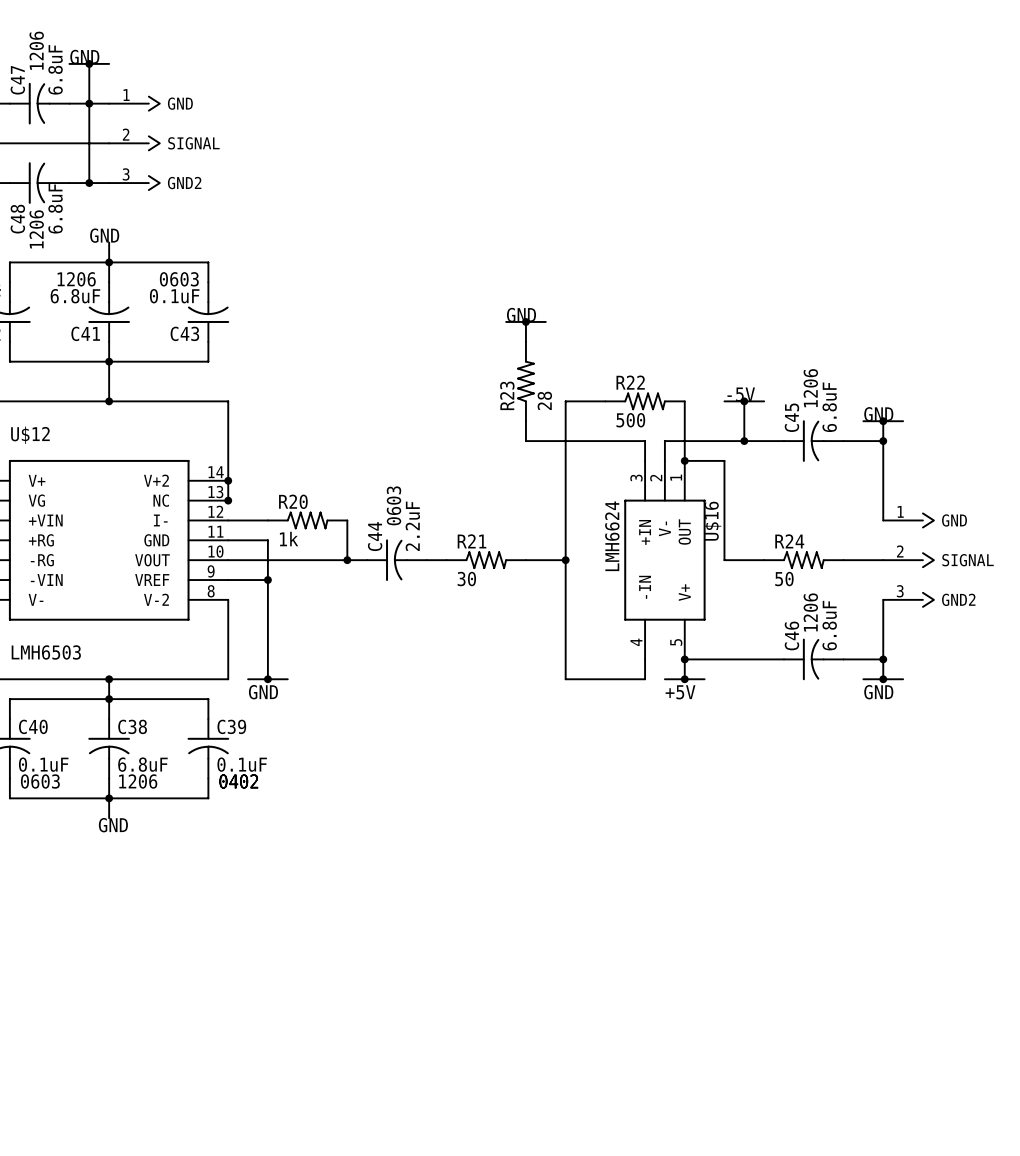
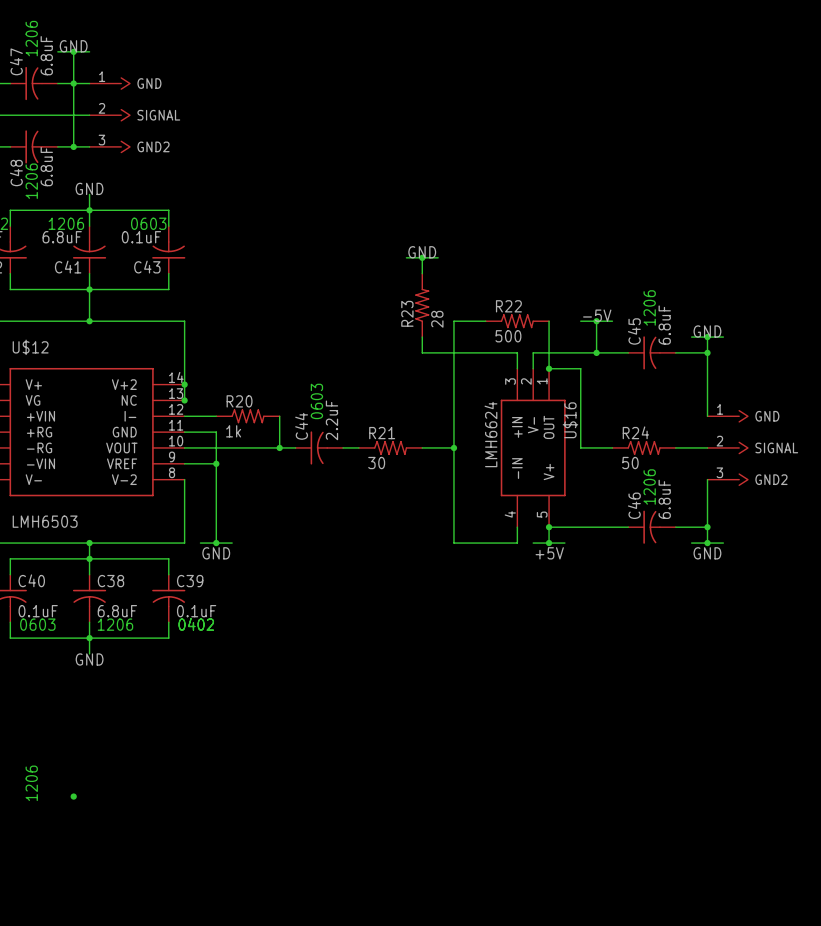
text: none -> 1206 (31, 783)
junction: none -> (73, 796)

